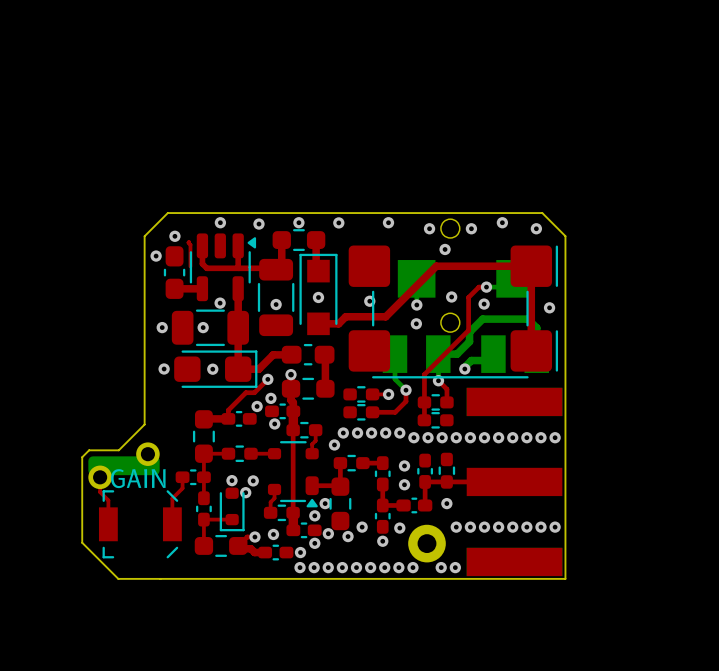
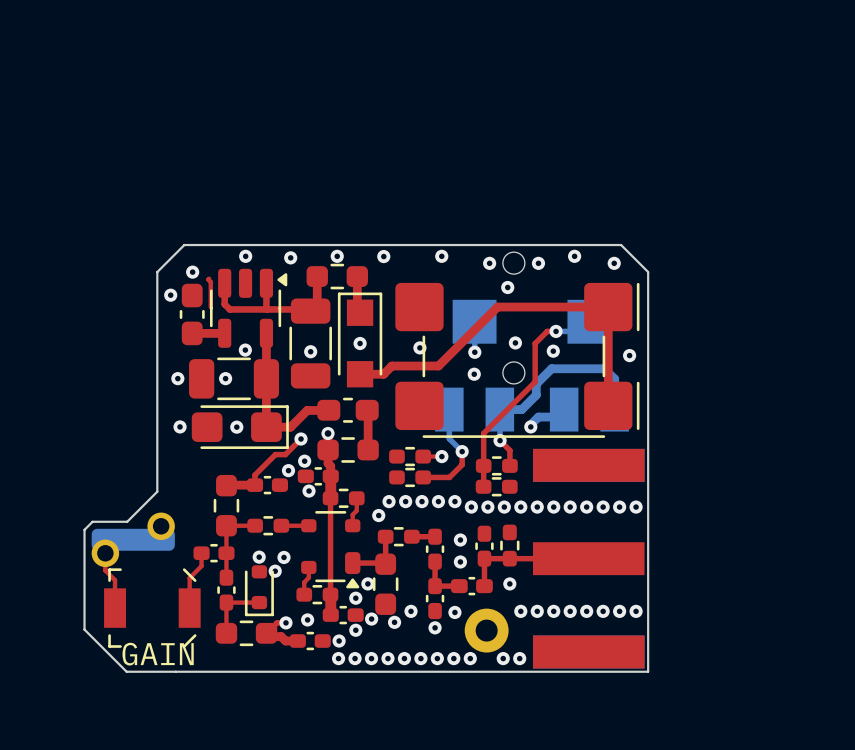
text position: GAIN (138, 478) -> GAIN (158, 654)

